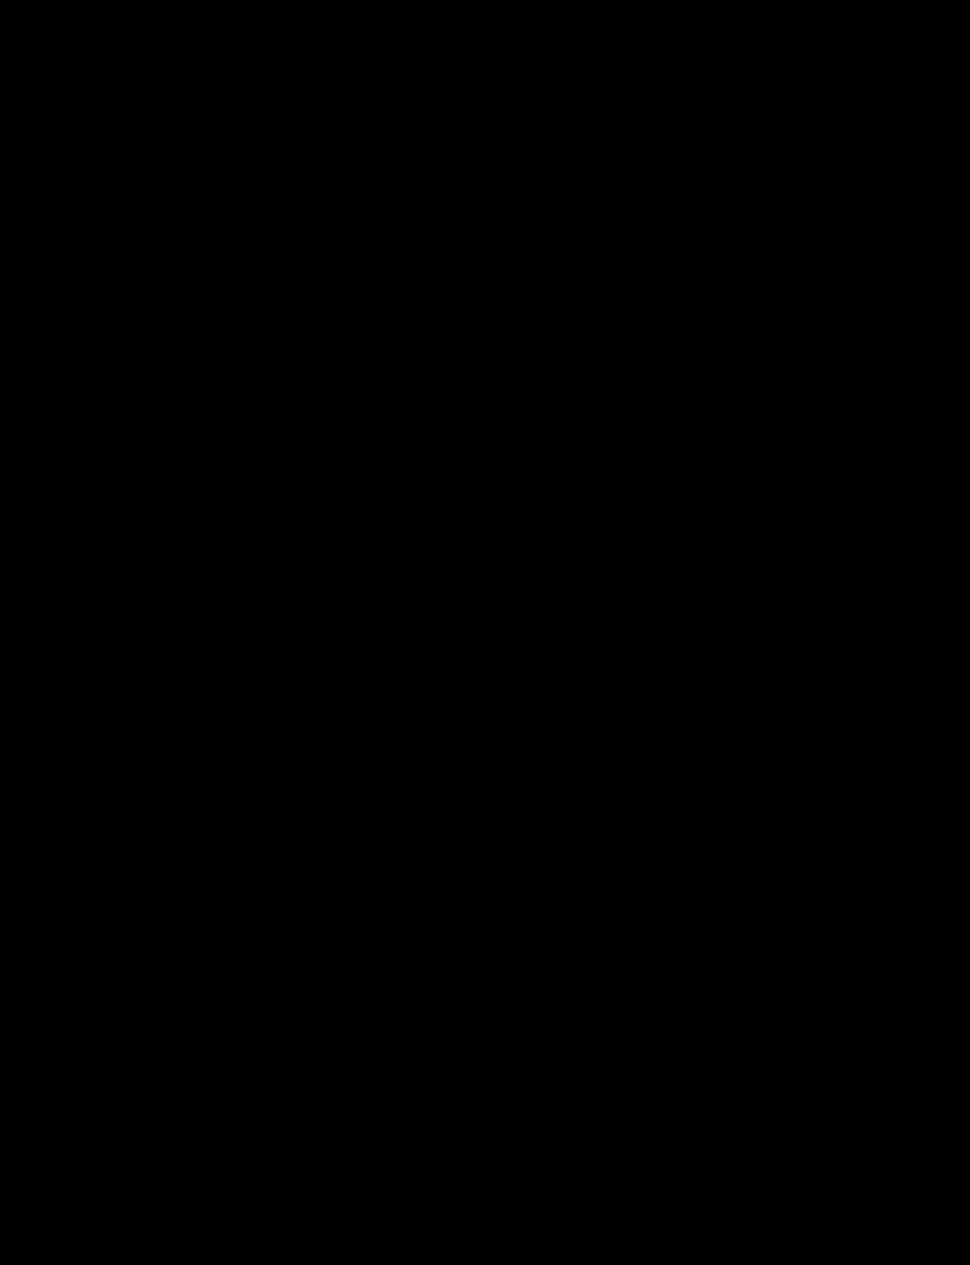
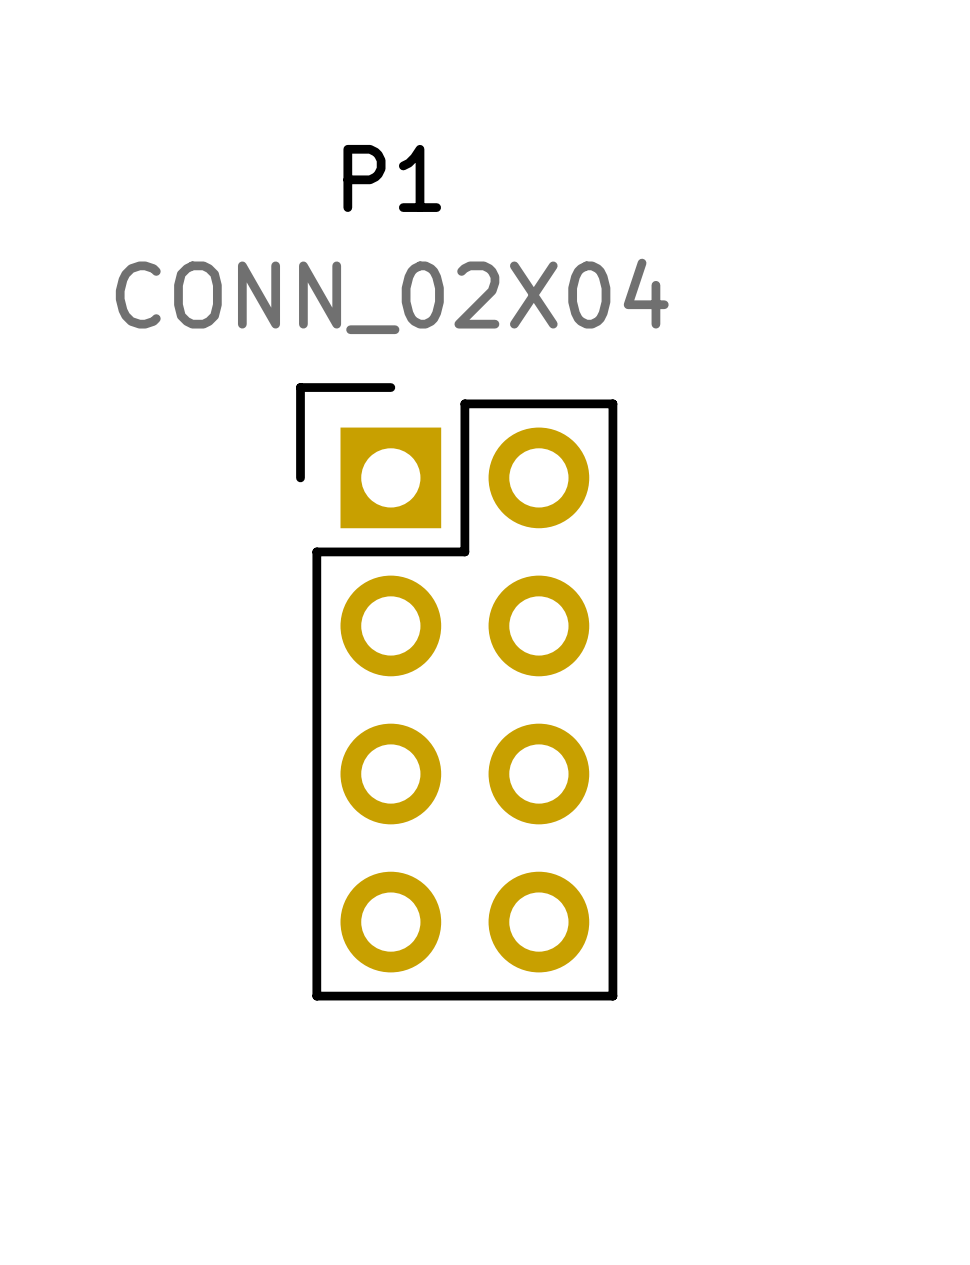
P1: none -> CONN_02X04 (456, 691)

